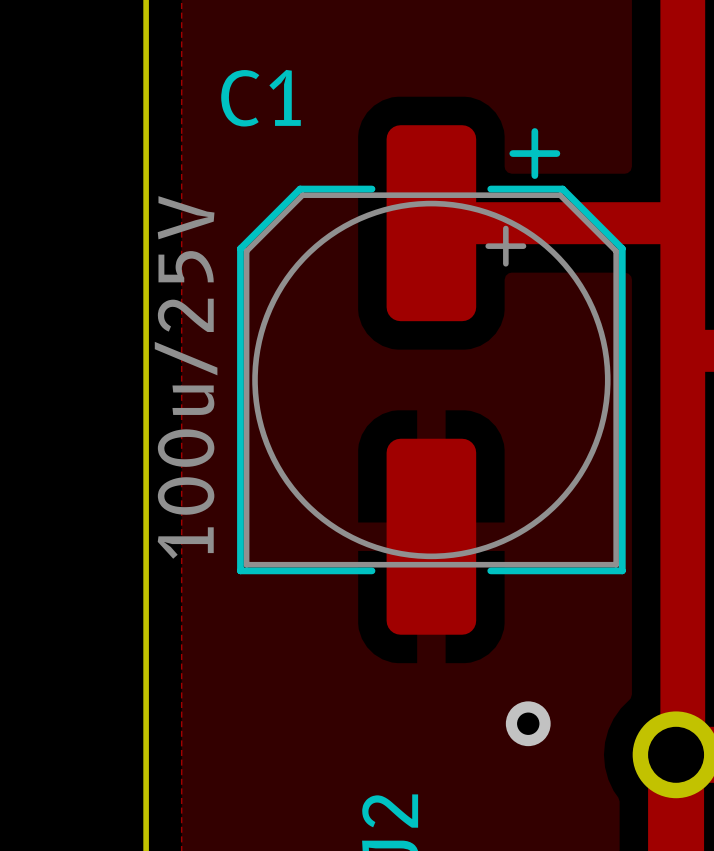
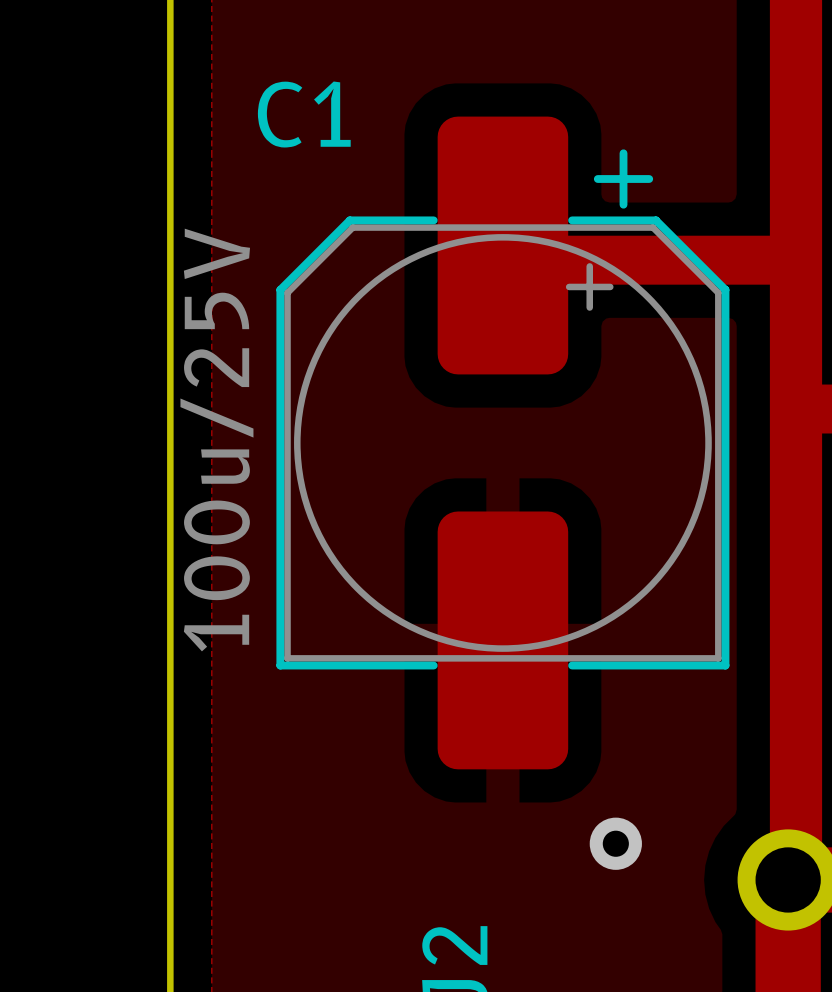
C1 footprint: [237, 125, 626, 635] -> [276, 116, 730, 770]

